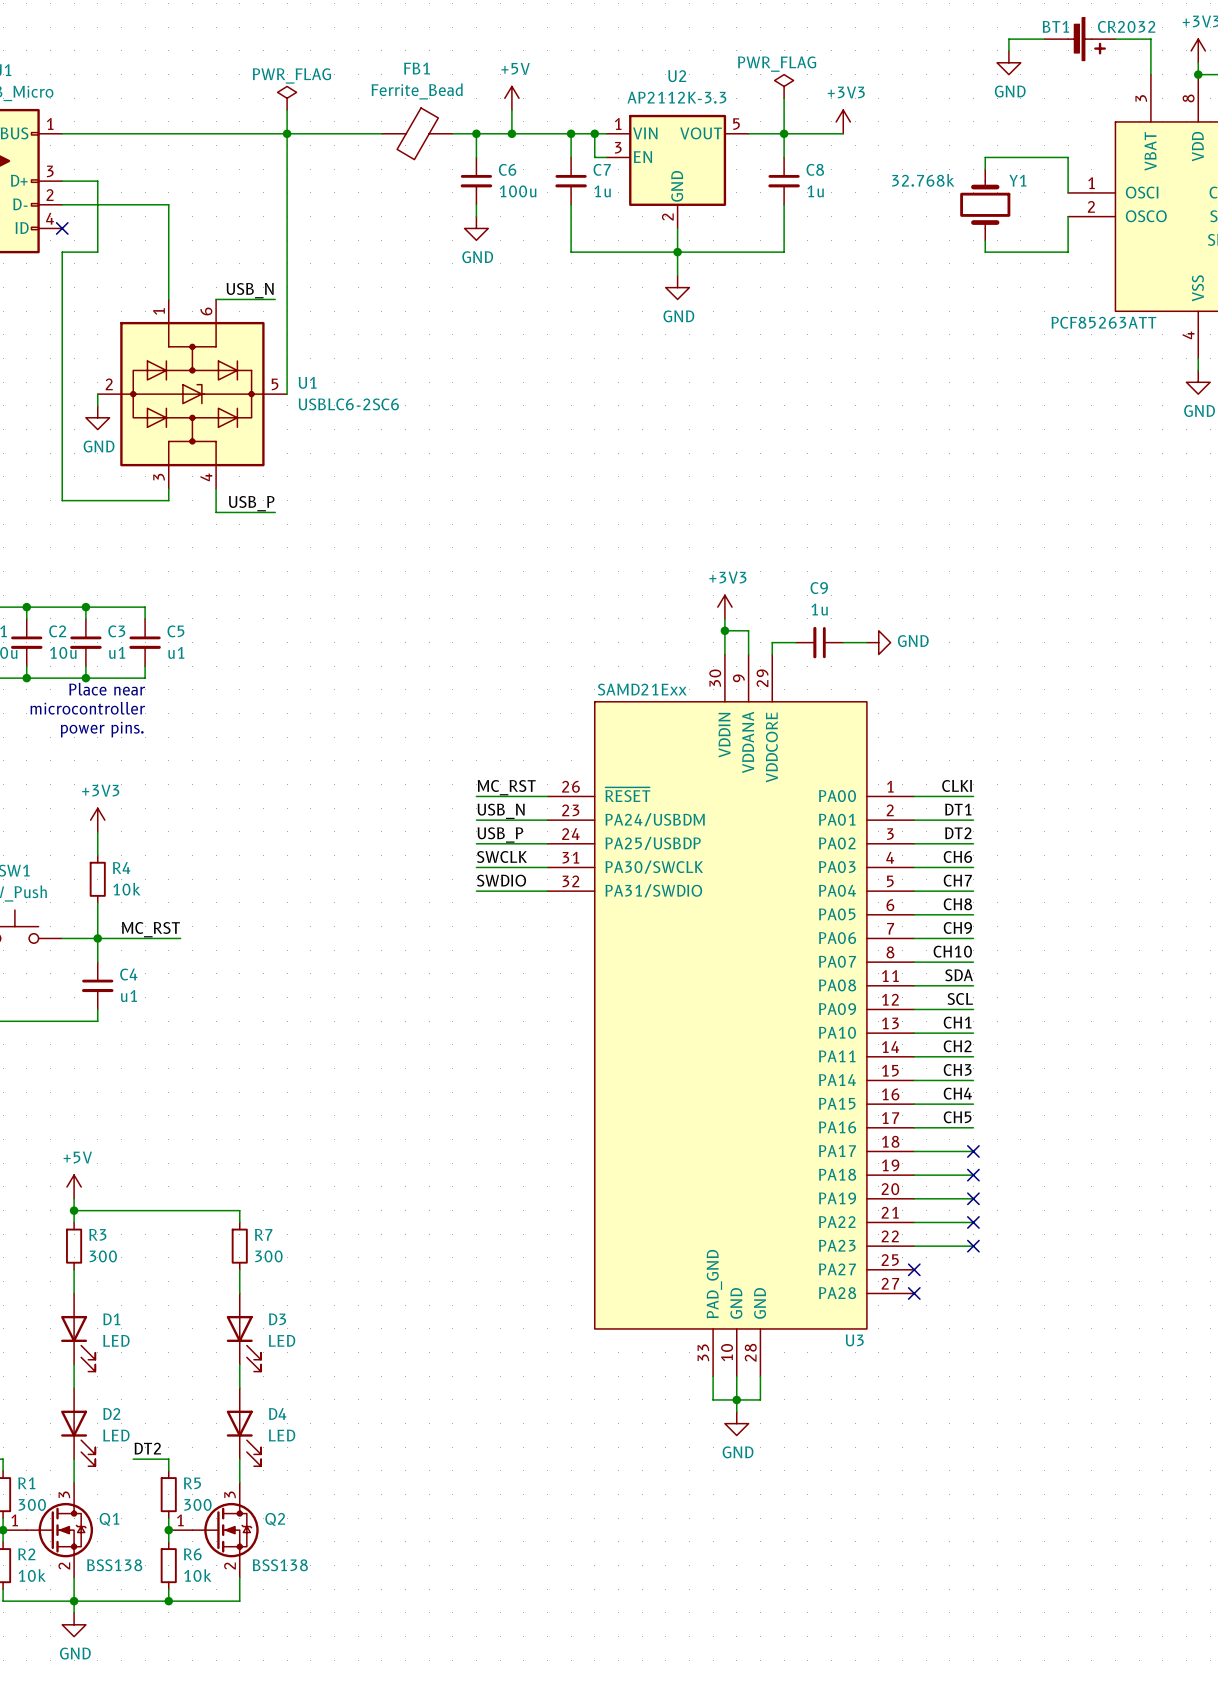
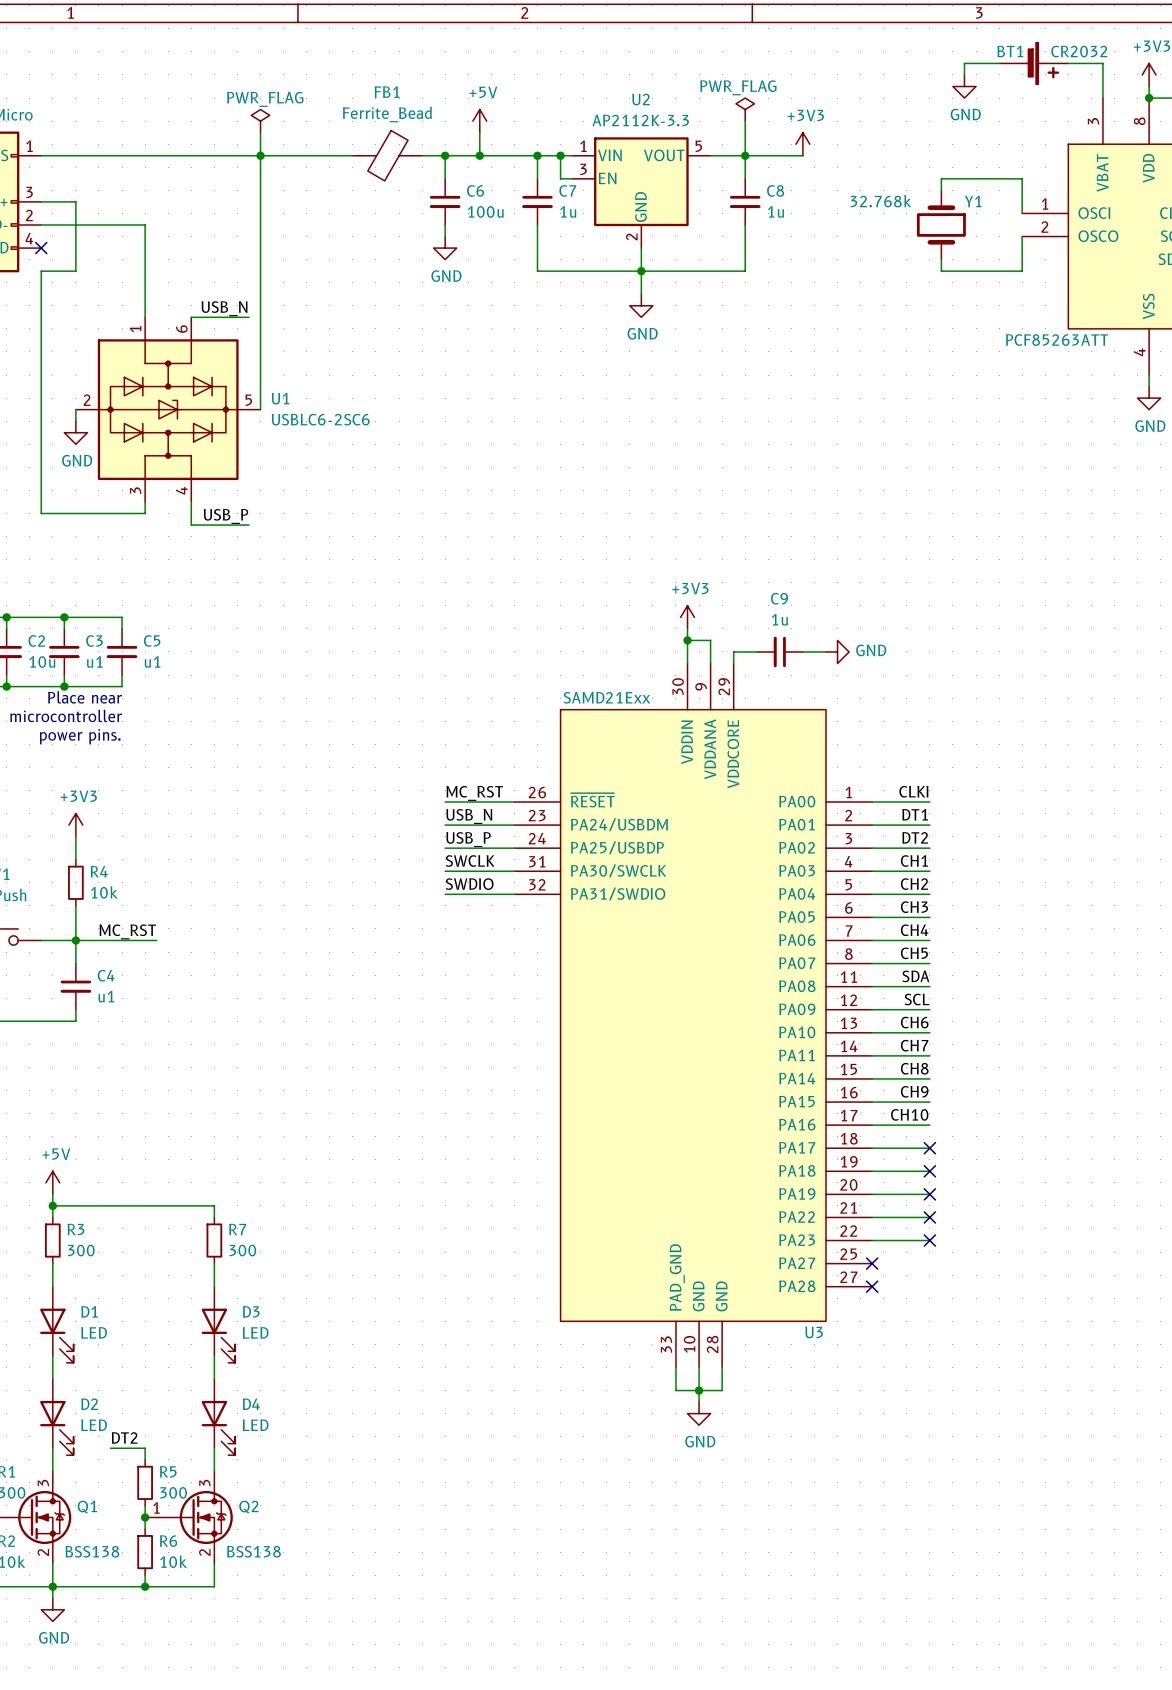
label: CH6 (957, 856) -> CH1 (914, 861)
label: CH7 (957, 880) -> CH2 (914, 884)
label: CH8 (957, 904) -> CH3 (914, 907)
label: CH9 (957, 927) -> CH4 (914, 930)
label: CH10 (952, 951) -> CH5 (914, 953)
label: CH1 (957, 1022) -> CH6 (914, 1022)
label: CH2 (957, 1046) -> CH7 (914, 1045)
label: CH3 (957, 1069) -> CH8 (914, 1068)
label: CH4 (957, 1093) -> CH9 (914, 1091)
label: CH5 (957, 1117) -> CH10 (909, 1114)

